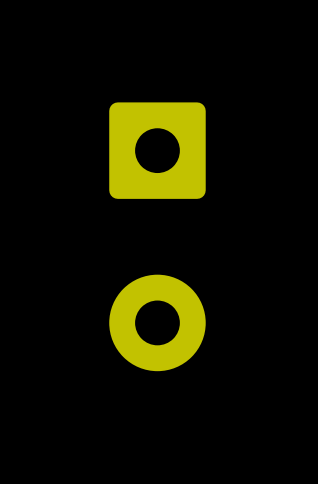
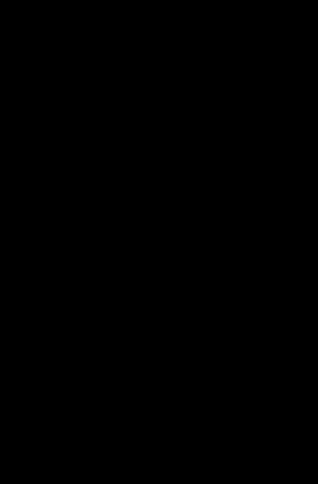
part: (157, 236) -> none

